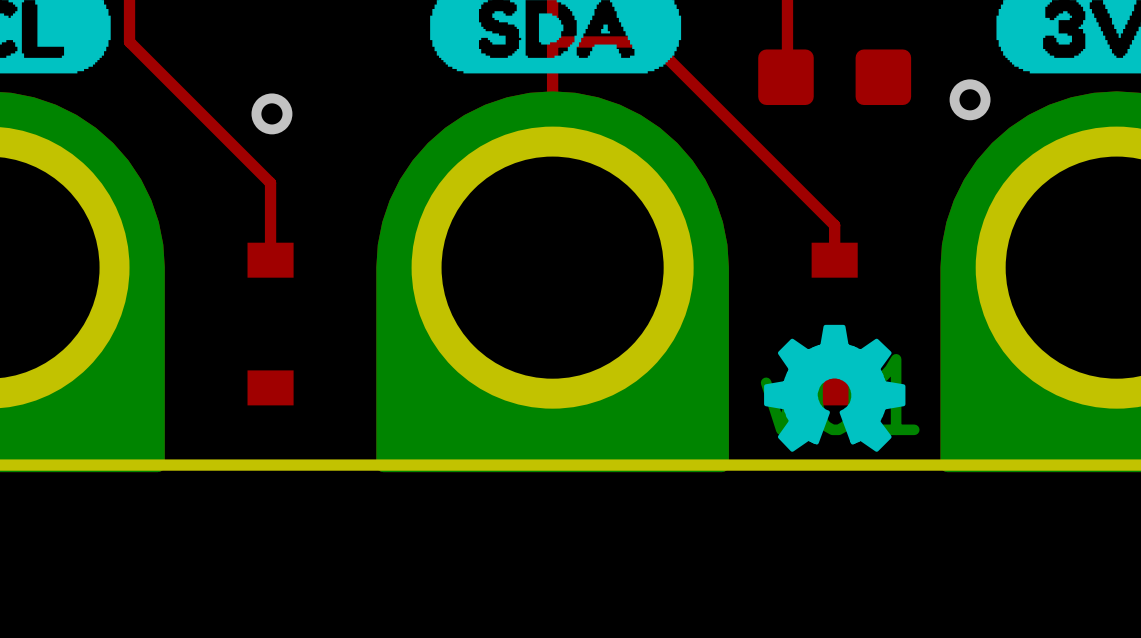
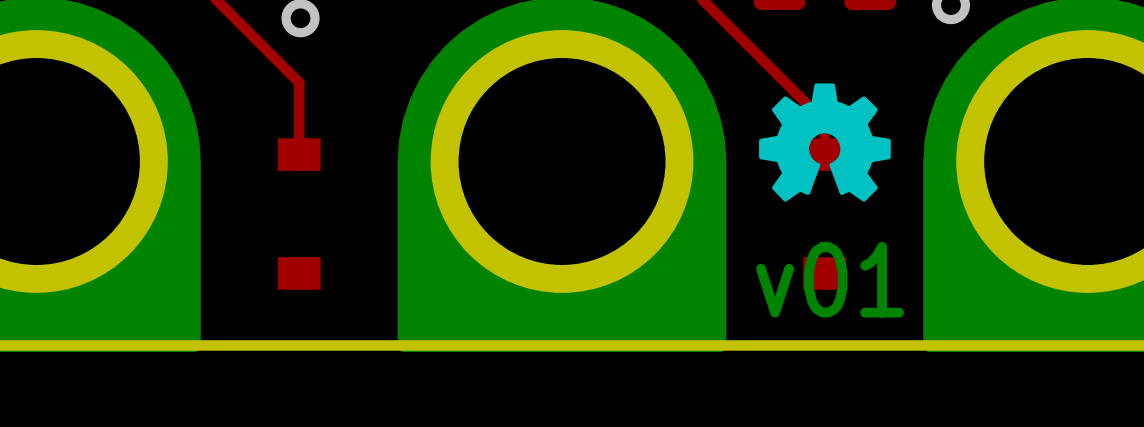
drawing position: (834, 388) -> (824, 142)

